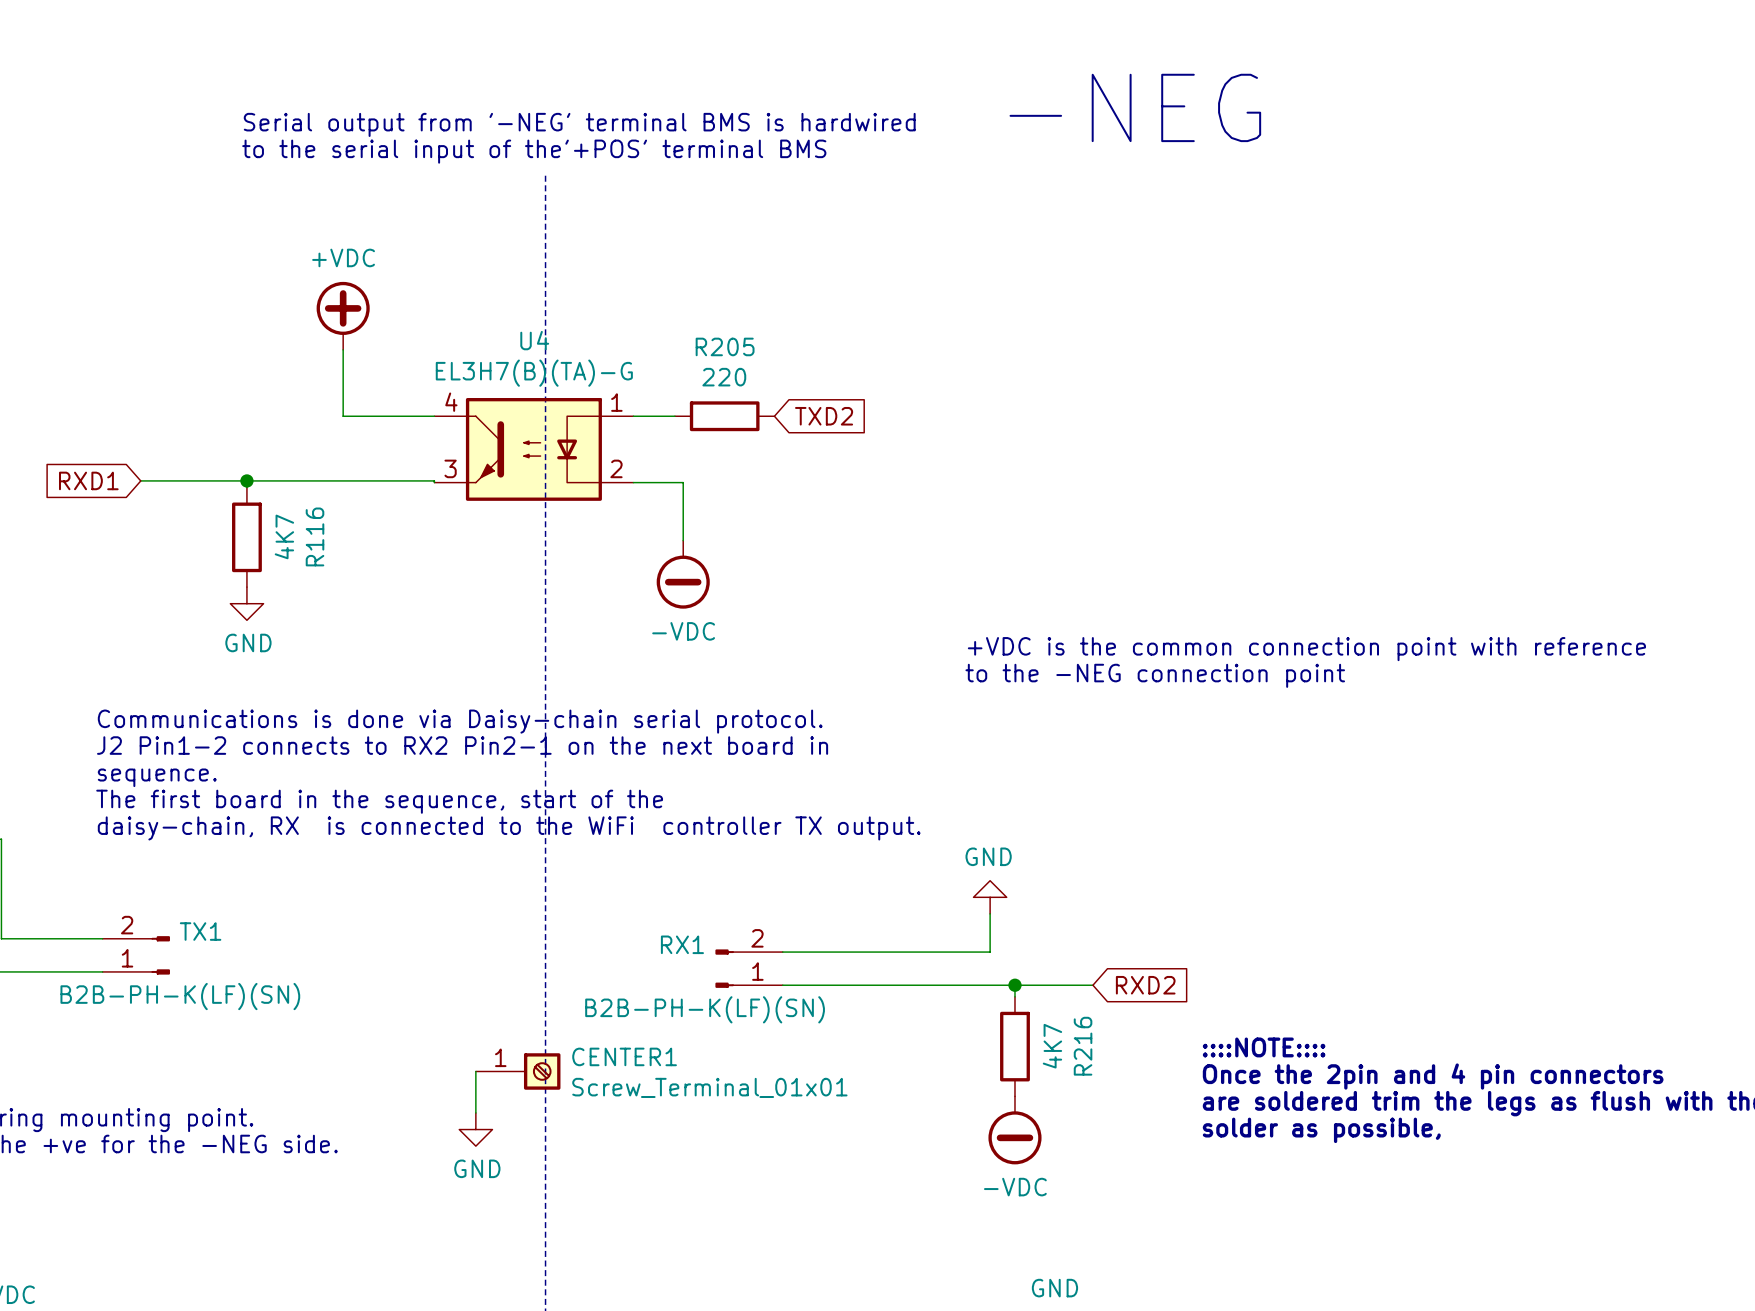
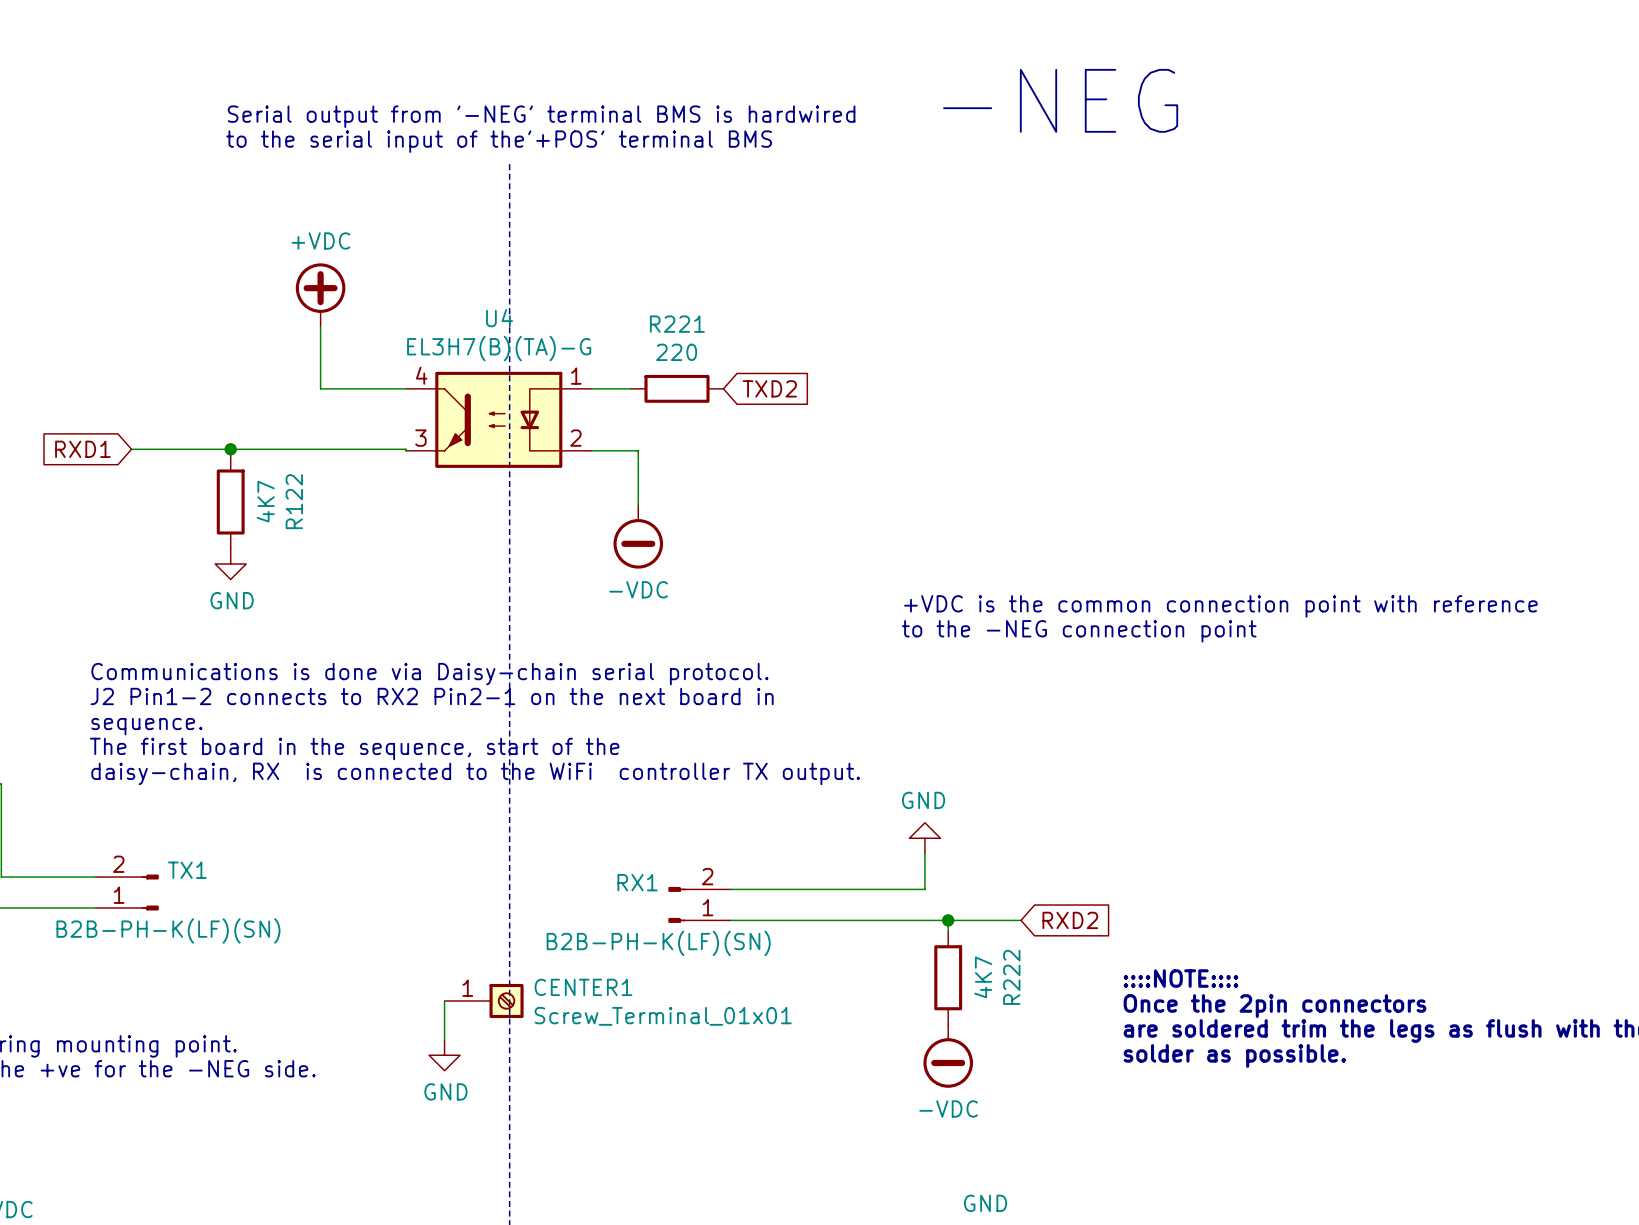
R205 name: R205 (725, 346) -> R221 (677, 324)
R116 name: R116 (315, 536) -> R122 (294, 501)
R216 name: R216 (1083, 1046) -> R222 (1011, 977)
text: Once the 2pin and 4 pin connectors (1433, 1076) -> Once the 2pin connectors (1275, 1006)
text: solder as possible, (1321, 1130) -> solder as possible. (1234, 1055)

